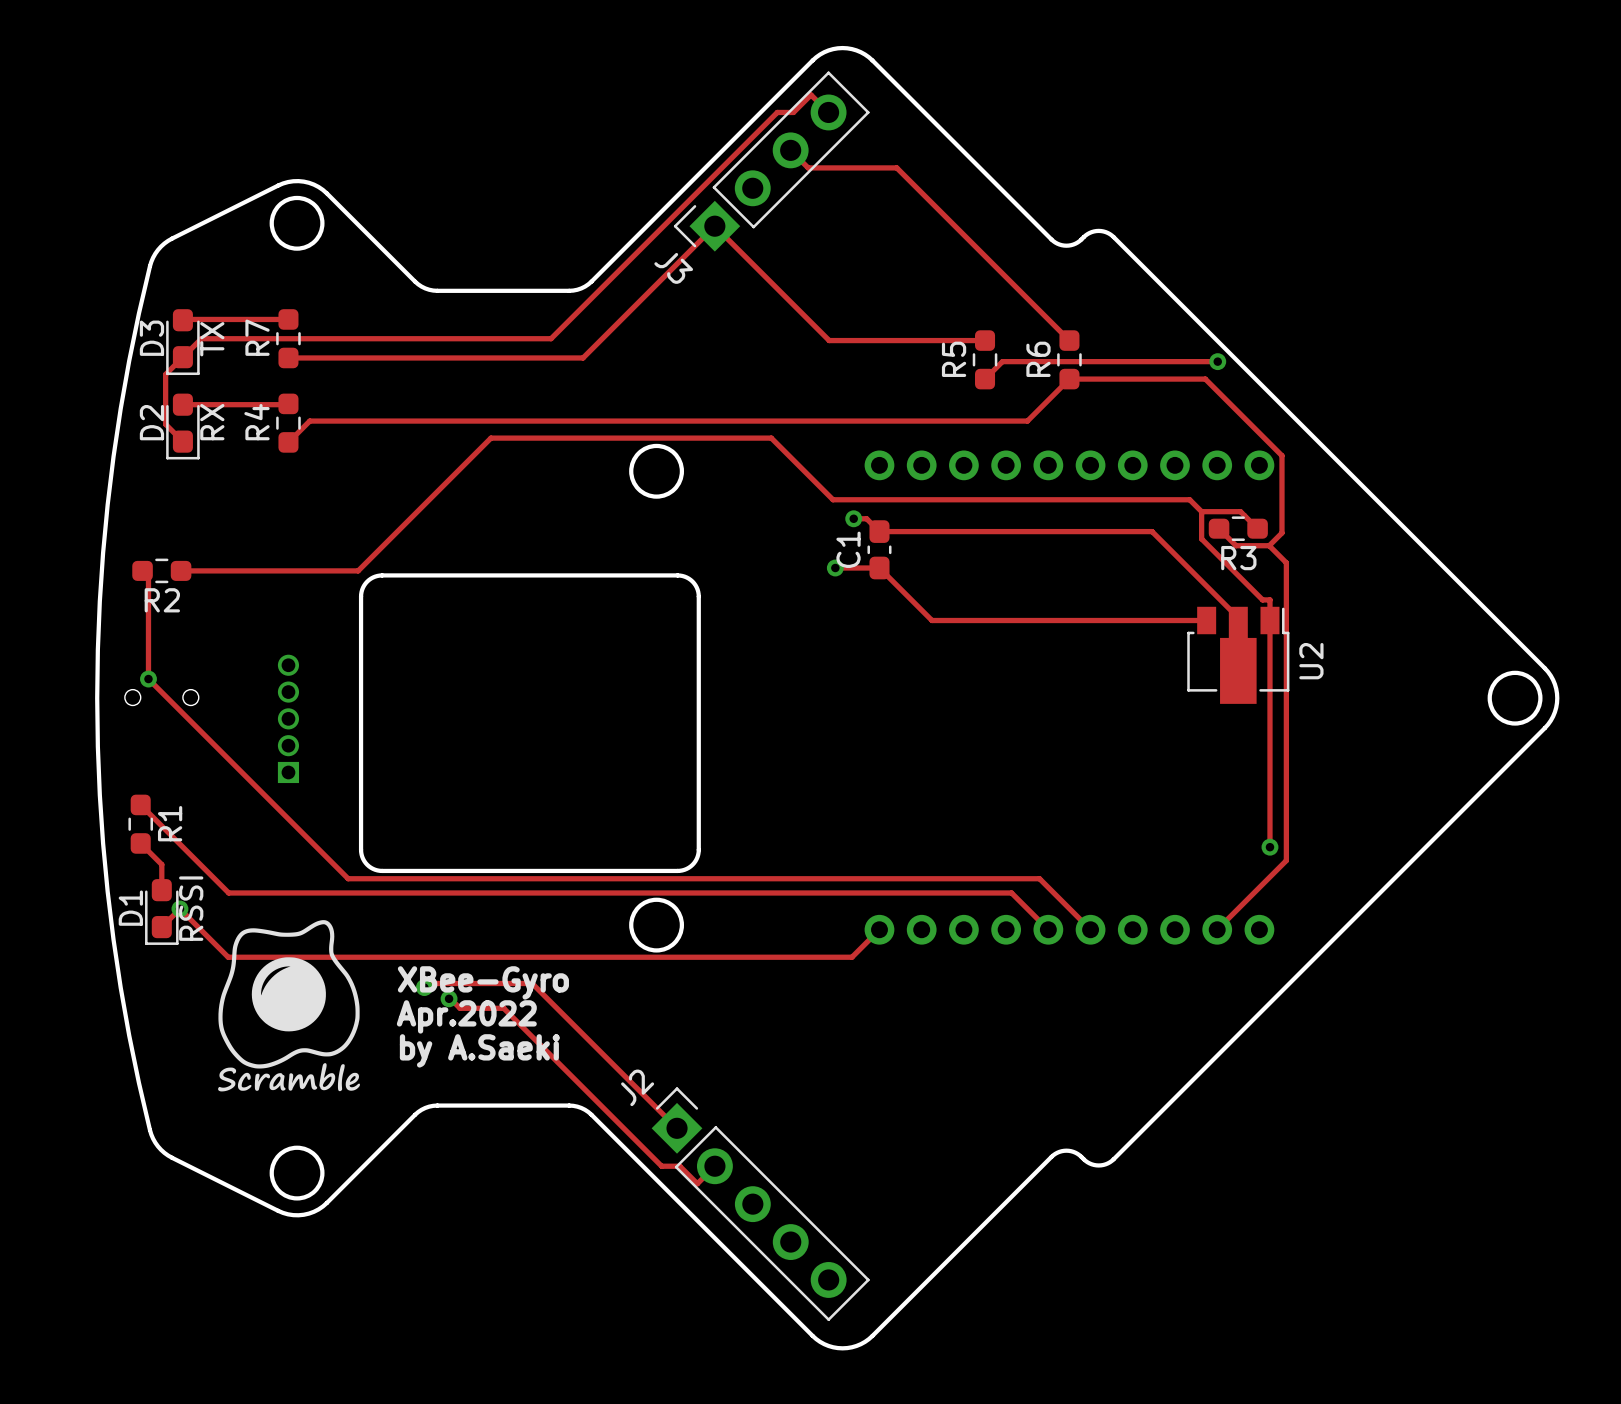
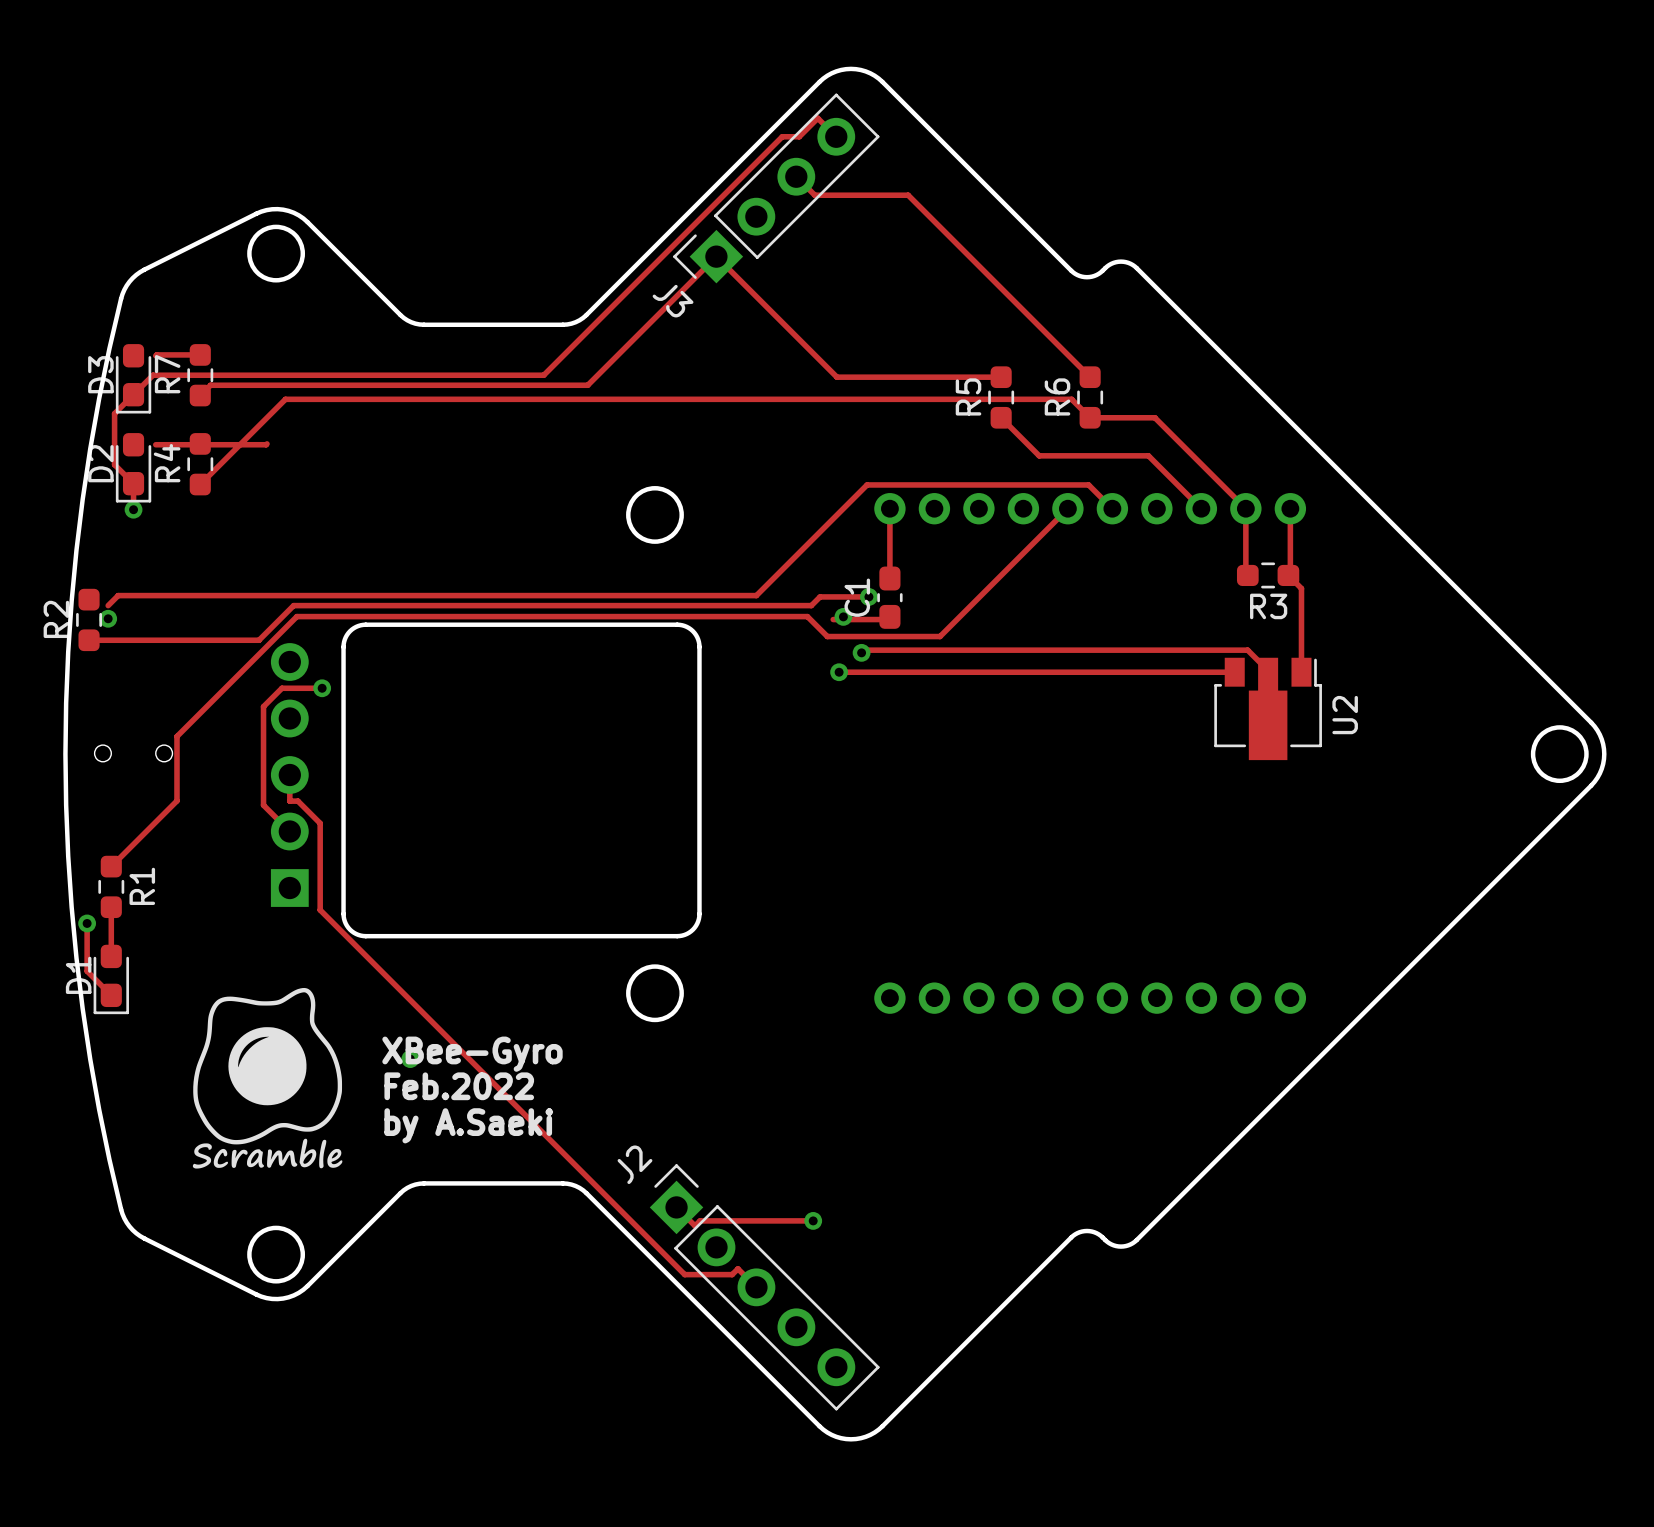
track: (225, 319) (288, 319) -> none
track: (201, 338) (165, 374) (165, 424) (182, 441) -> (175, 375) (153, 375) (114, 413) (114, 464) (133, 483) (133, 509)
R7 position: (288, 338) -> (200, 375)
D3 value: TX (212, 339) -> none
D3 position: (182, 342) -> (133, 378)
track: (592, 348) (583, 357) (288, 357) -> (587, 385) (210, 385) (200, 395)
track: (1217, 361) (1002, 361) (985, 379) -> (1201, 508) (1148, 455) (1039, 455) (1001, 417)
via: (1217, 361) -> none
track: (1069, 379) (1027, 421) (309, 421) (288, 442) -> (1090, 417) (1071, 399) (285, 399) (200, 484)
track: (1130, 379) (1205, 379) (1281, 455) (1281, 532) (1269, 545) -> (1154, 417) (1245, 508) (1245, 573) (1247, 575)
D2 value: RX (212, 422) -> none
R4 position: (288, 423) -> (200, 464)
D2 position: (182, 426) -> (133, 467)
track: none -> (889, 508) (889, 578)
track: none -> (1112, 508) (1088, 484) (867, 484) (756, 595) (118, 595) (108, 605)
via: none -> (133, 509)
track: (1201, 511) (1201, 538) (1262, 599) (1269, 599) -> (1290, 508) (1290, 573) (1288, 575) (1301, 588) (1301, 650)
track: (1201, 511) (1240, 511) (1257, 528) -> none
track: (1201, 511) (1189, 499) (833, 499) (771, 438) (490, 438) (358, 570) (181, 570) -> none
track: (853, 518) (866, 518) (879, 531) (1152, 531) (1238, 618) -> (861, 652) (864, 650) (1247, 650) (1268, 670)
via position: (853, 518) -> (868, 596)
track: (1219, 528) (1236, 545) (1269, 545) -> none
track: (1269, 545) (1286, 562) (1286, 860) (1217, 929) -> none
track: none -> (868, 596) (820, 596) (811, 605) (293, 605) (259, 640) (89, 640)
track: (835, 568) (879, 568) (931, 620) -> (839, 672) (945, 672)
track: none -> (889, 616) (887, 619) (833, 619)
via: none -> (108, 618)
track: (142, 570) (148, 576) (148, 679) (348, 878) (1039, 878) (1090, 929) -> none
R2 rotation: 0° (161, 570) -> 90° clockwise (89, 619)
R2 position: (161, 570) -> (89, 619)
via: none -> (861, 652)
via: none -> (839, 672)
track: (1269, 620) (1269, 847) -> none
track: none -> (322, 688) (281, 688) (263, 706) (263, 805) (289, 831)
via: none -> (322, 688)
via: (148, 679) -> none
part: (288, 718) -> none
track: none -> (289, 775) (289, 801) (297, 801) (320, 823) (320, 910) (684, 1274) (732, 1274) (737, 1268) (756, 1287)
part: none -> (289, 775)
track: (140, 804) (228, 892) (1011, 892) (1048, 929) -> (111, 866) (176, 800) (176, 736) (296, 616) (807, 616) (827, 636) (940, 636) (1067, 508)
track: (140, 843) (161, 864) (161, 890) -> (111, 907) (111, 956)
via: (1269, 847) -> none
track: none -> (87, 923) (87, 971) (111, 995)
via position: (179, 908) -> (87, 923)
D1 value: RSSI (191, 908) -> none
D1 position: (161, 912) -> (111, 979)
track: (161, 927) (179, 908) (228, 957) (851, 957) (879, 929) -> none
track: (424, 987) (428, 983) (532, 983) (677, 1128) -> (813, 1220) (700, 1220) (695, 1225) (676, 1207)
track: (449, 998) (460, 1008) (503, 1008) (661, 1166) (679, 1166) (697, 1183) (714, 1166) -> none
via: (449, 998) -> none
text: Apr.2022 (466, 1016) -> Feb.2022 (459, 1086)
via: none -> (813, 1220)

